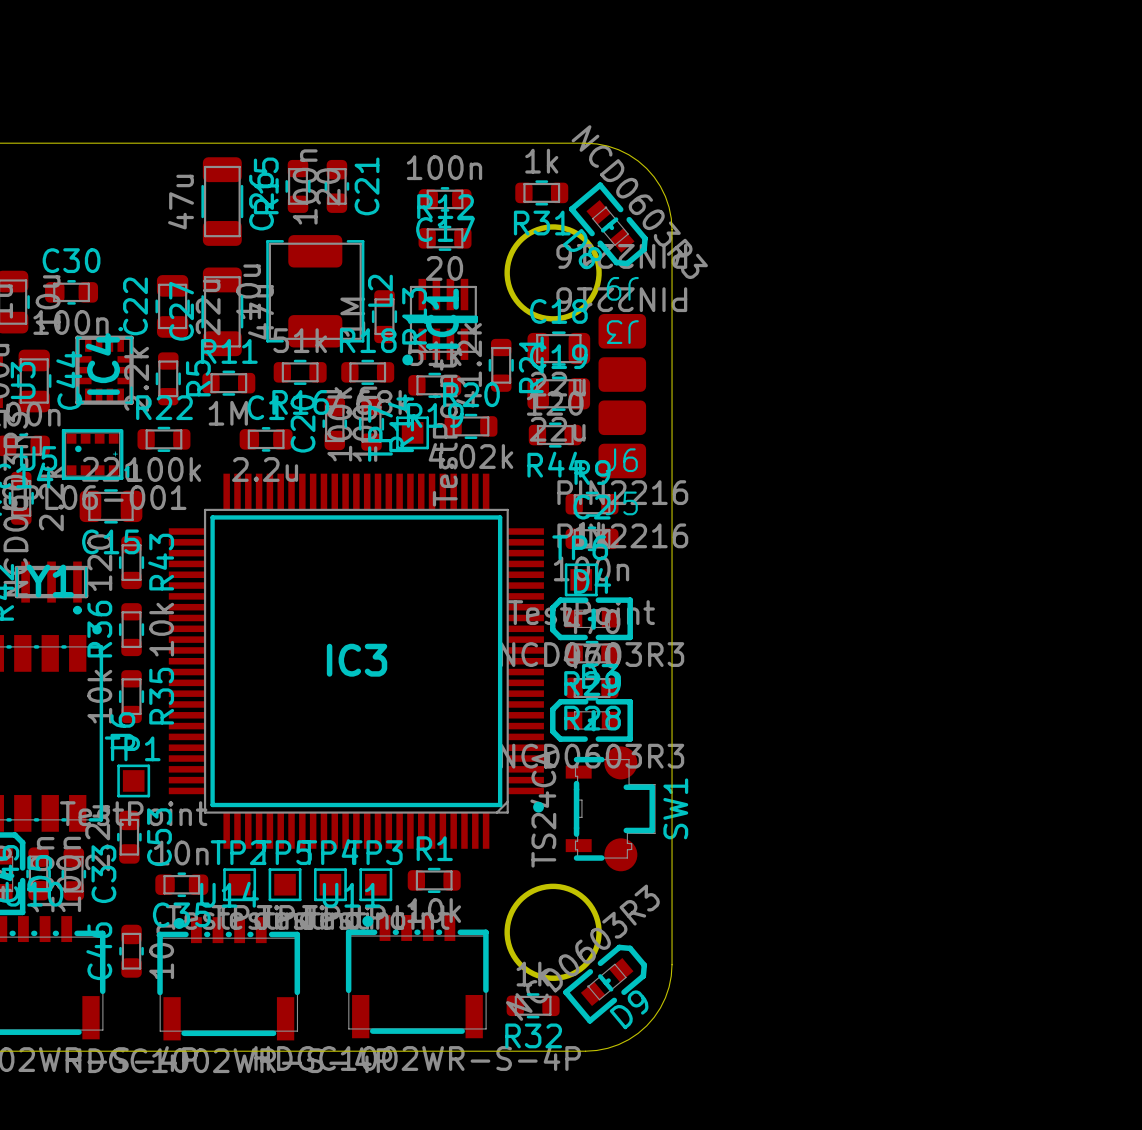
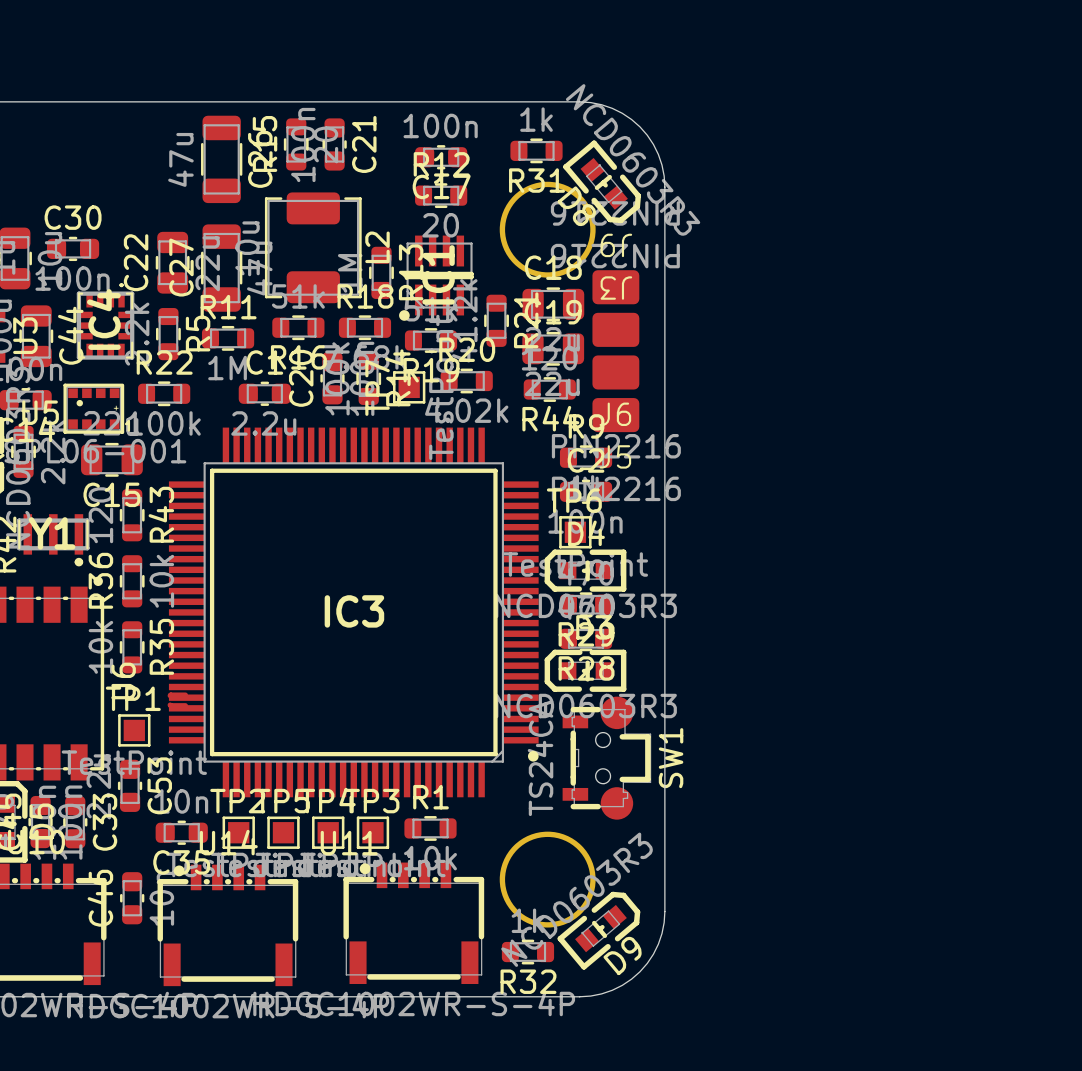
track: none -> (185, 695) (170, 695)
SW1 footprint: [565, 746, 656, 872] -> [562, 696, 652, 820]
track: none -> (170, 705) (185, 705)

